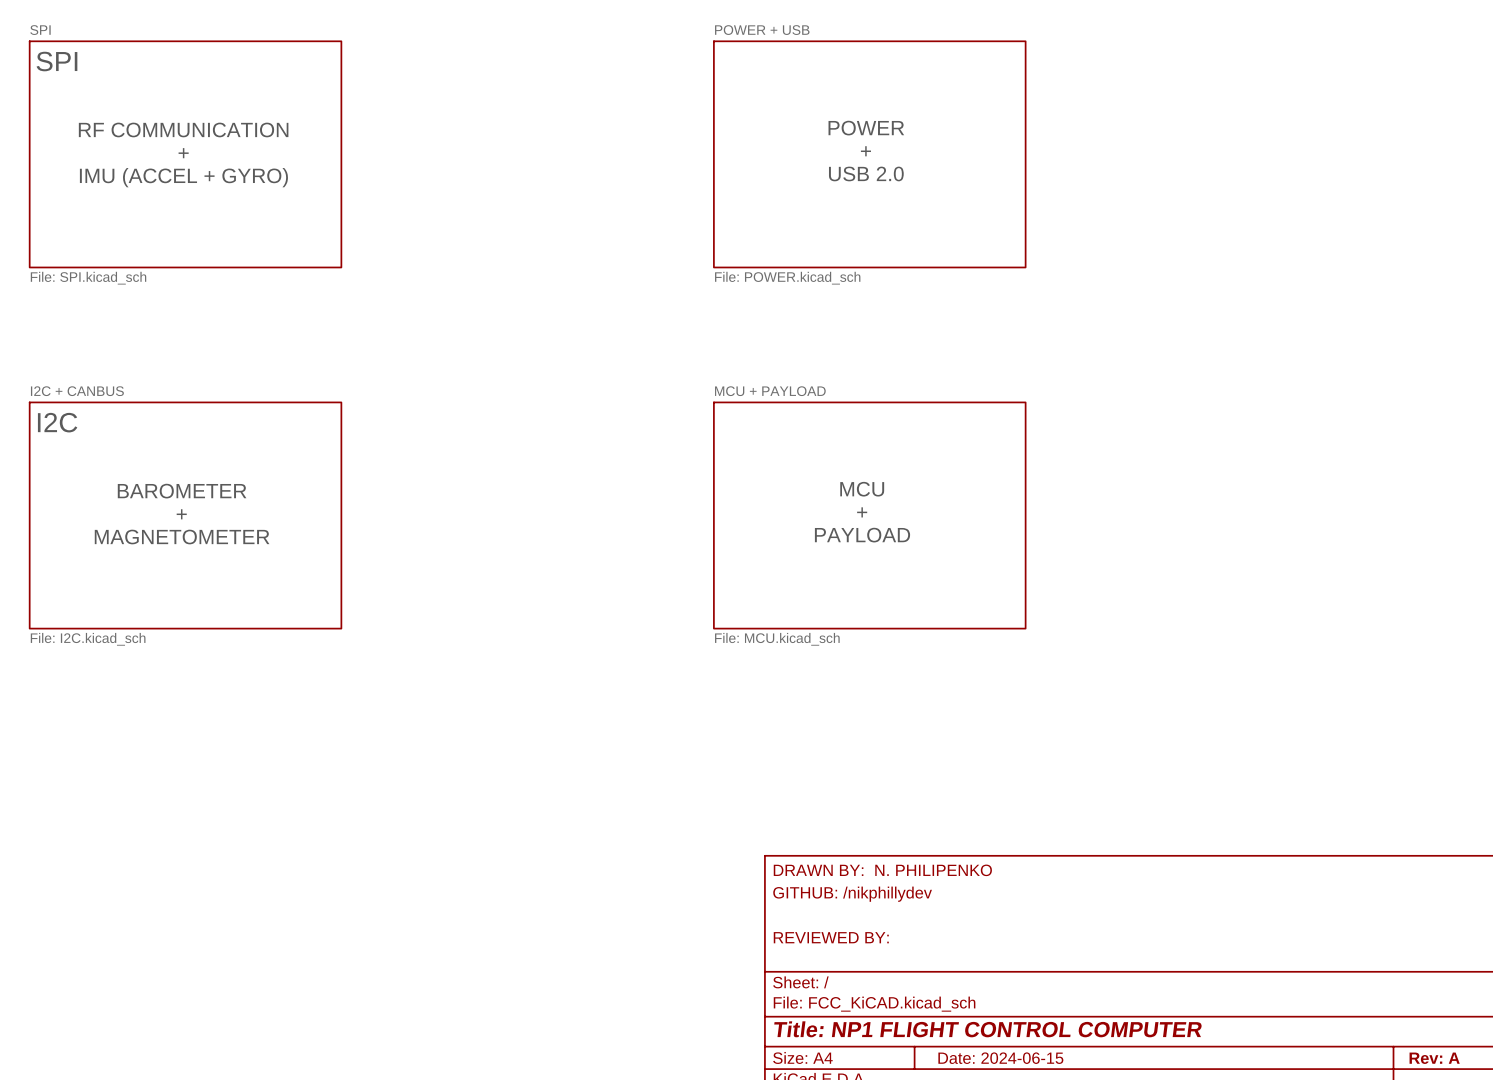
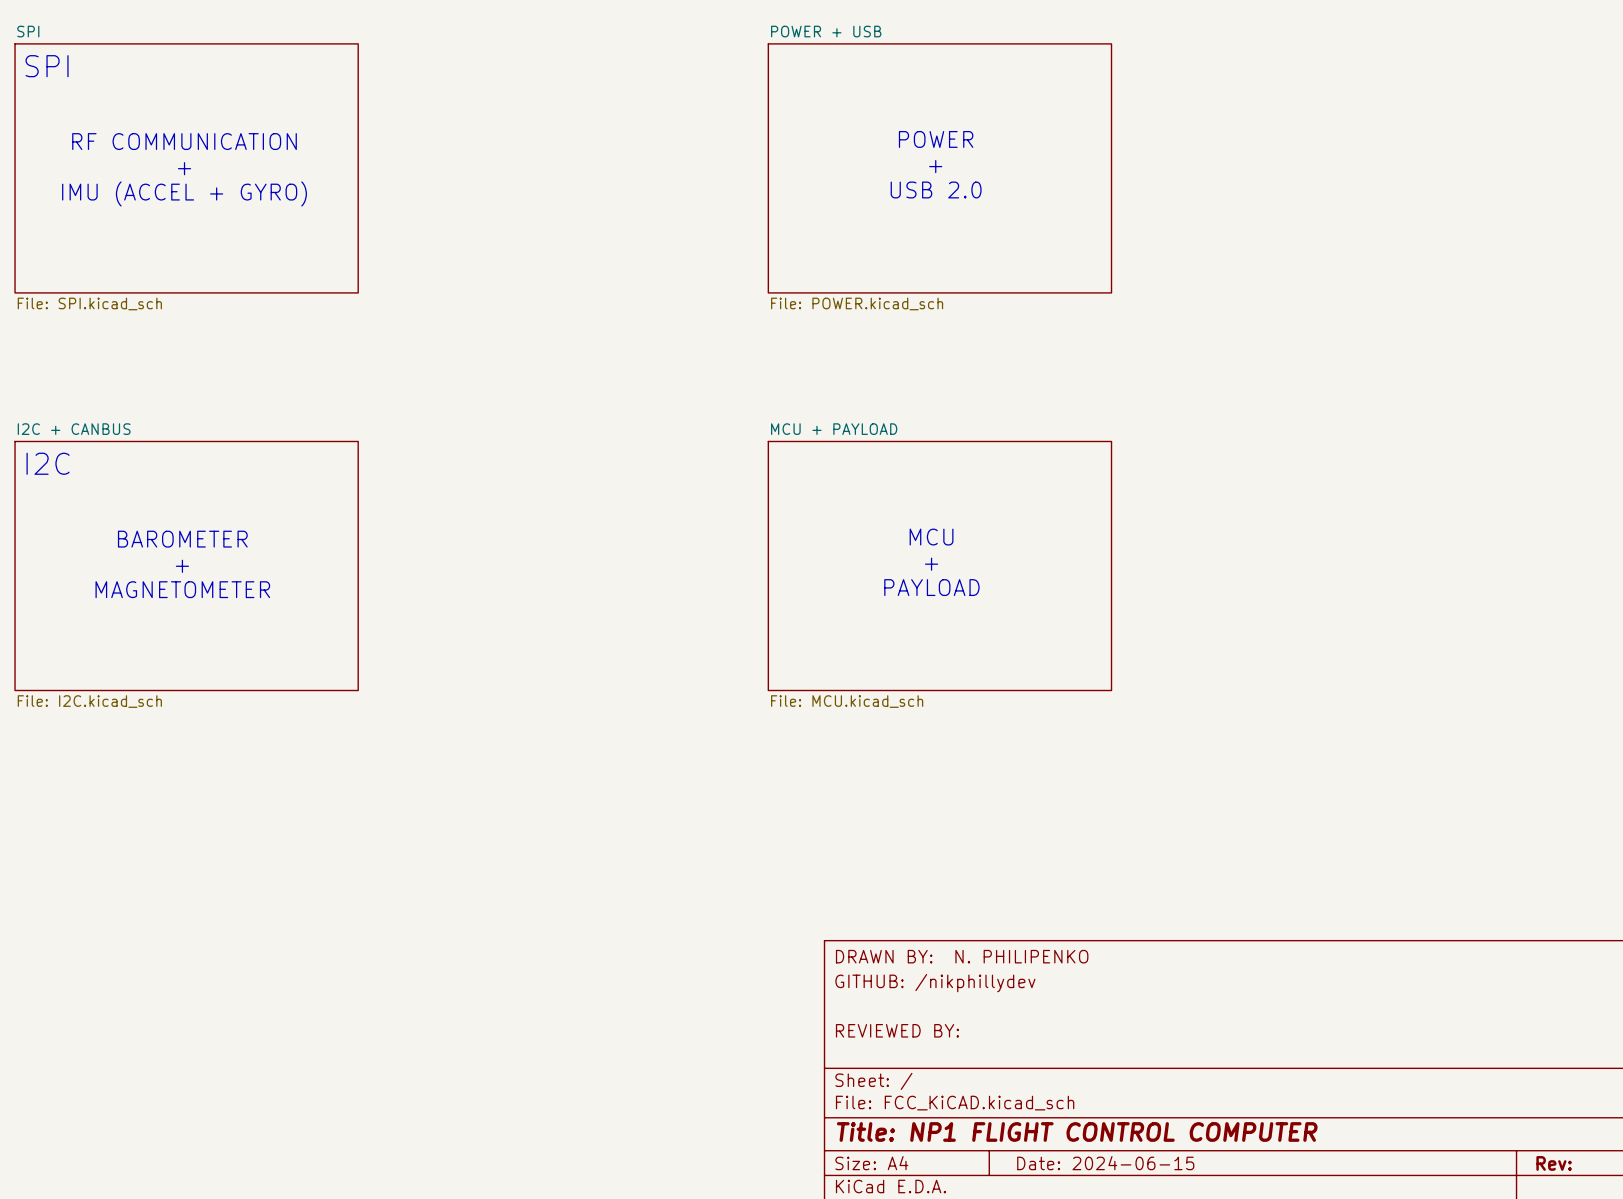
title block: Rev: A (1434, 1058) -> Rev: (1554, 1163)

